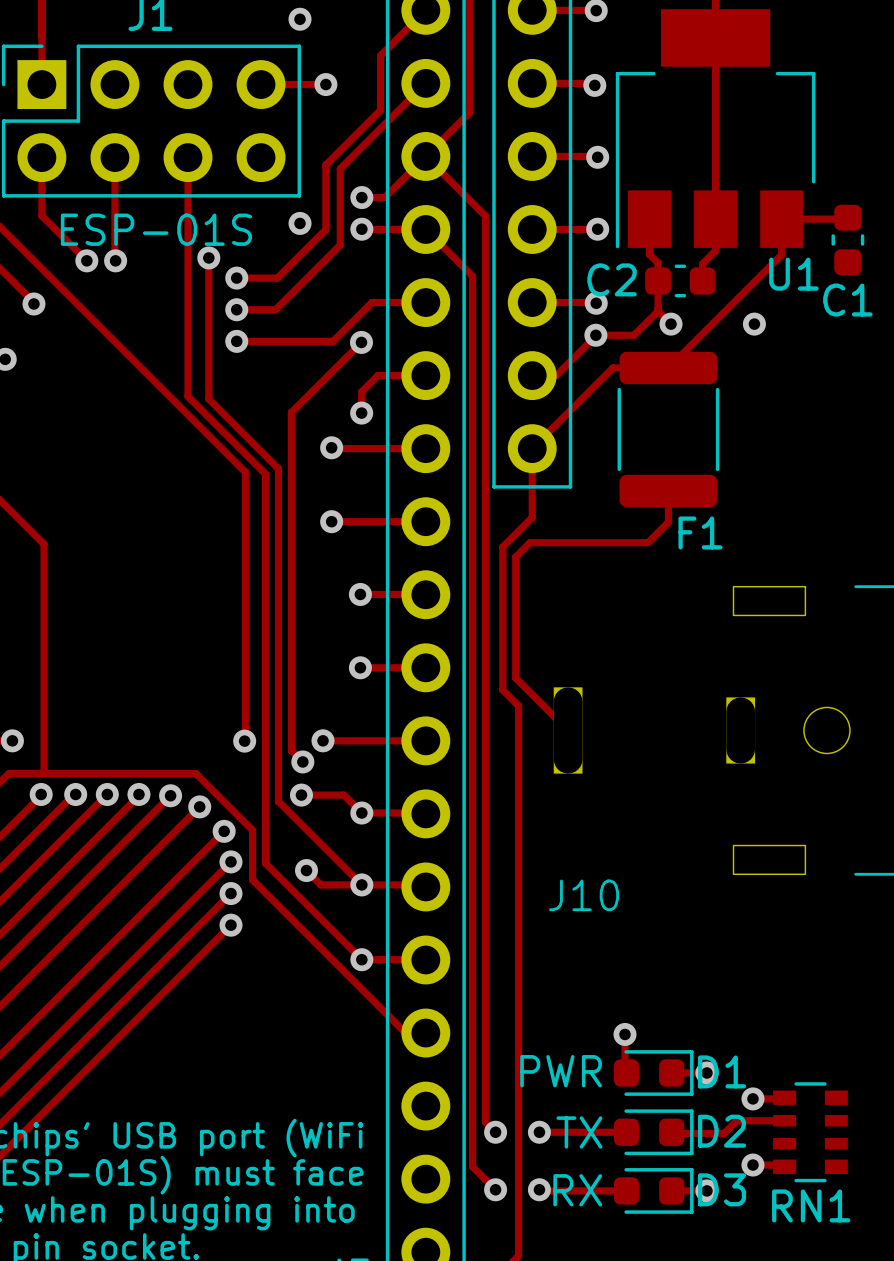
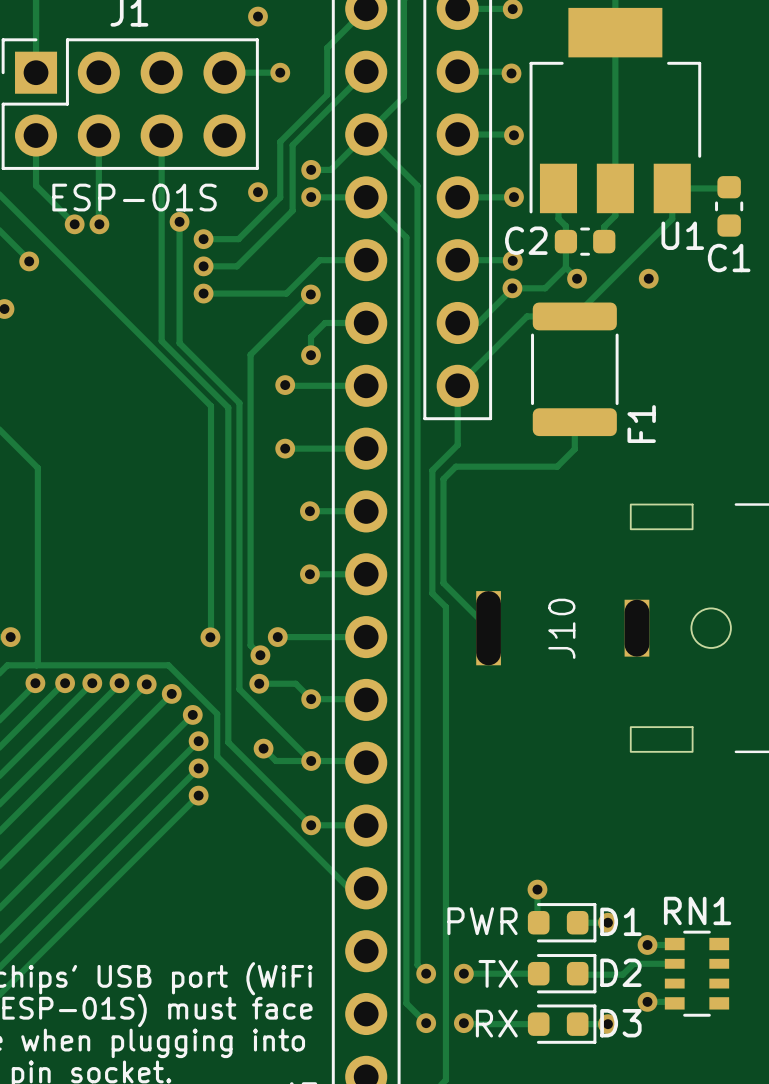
F1 name rotation: 0° (700, 532) -> 90° counterclockwise (641, 424)
J10 name rotation: 0° (584, 895) -> 90° counterclockwise (561, 628)
J10 name position: J10 (584, 895) -> J10 (561, 628)
RN1 name position: RN1 (811, 1205) -> RN1 (697, 910)

